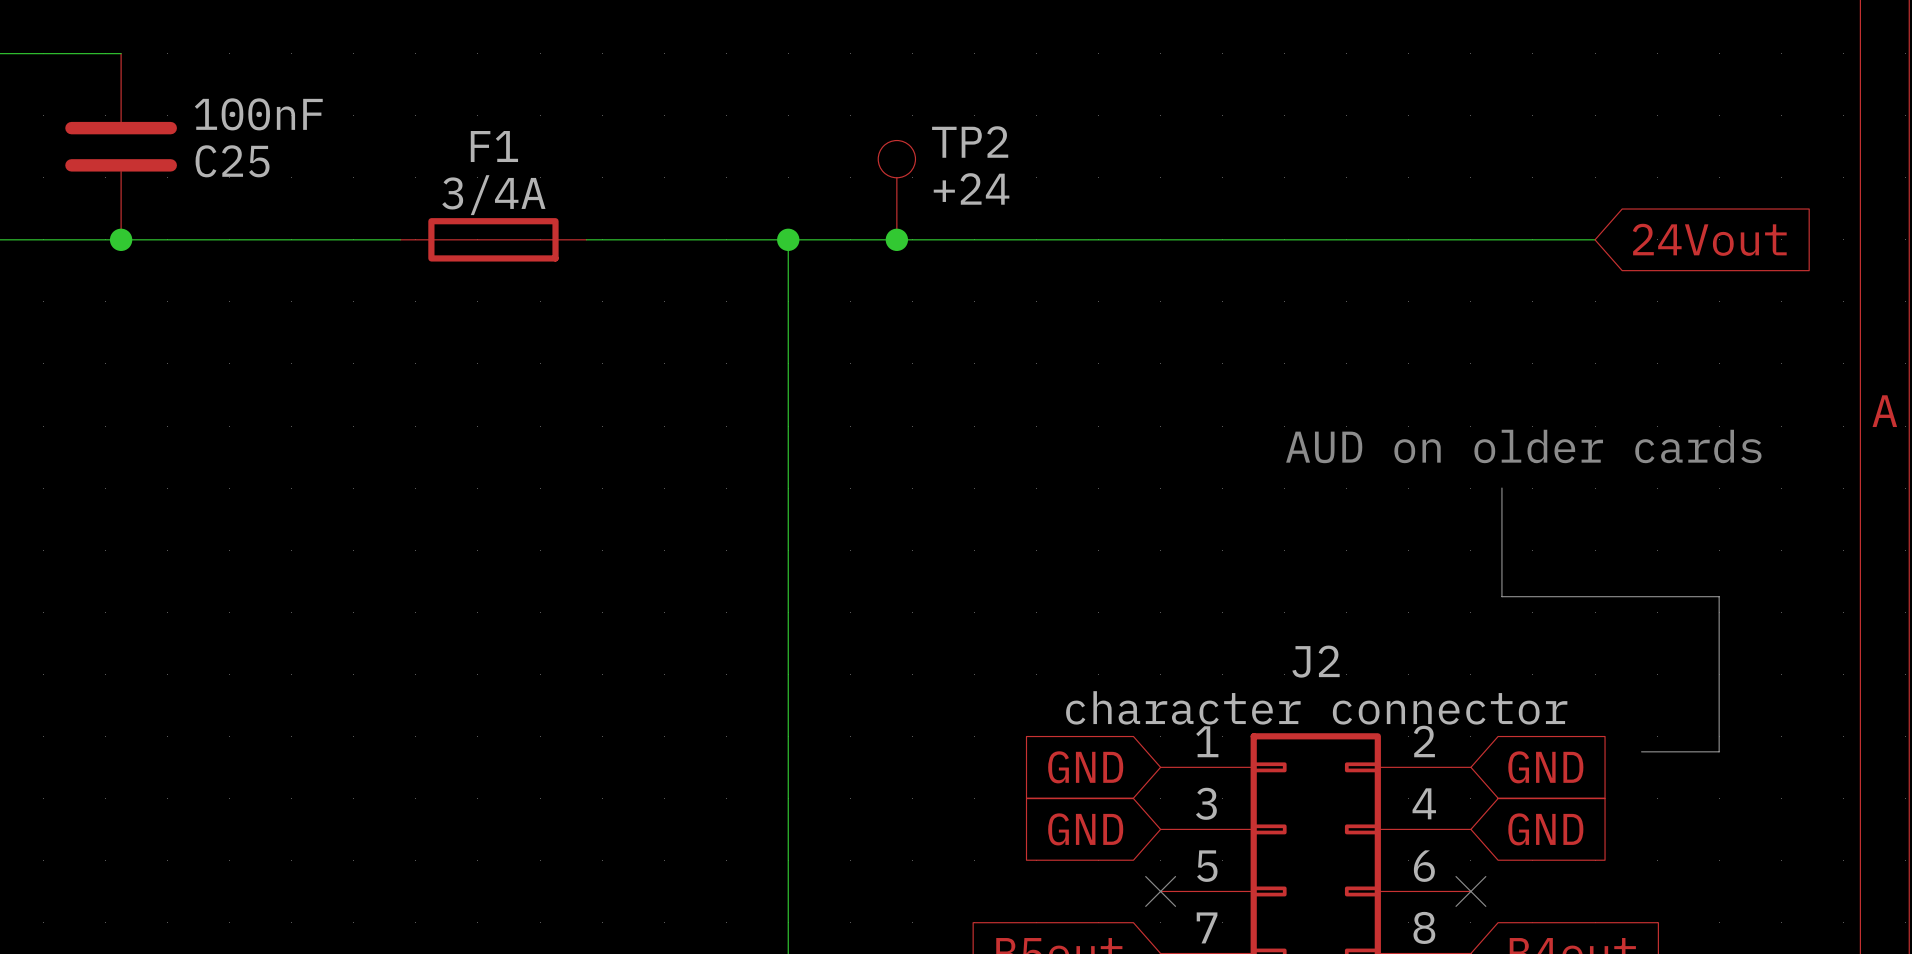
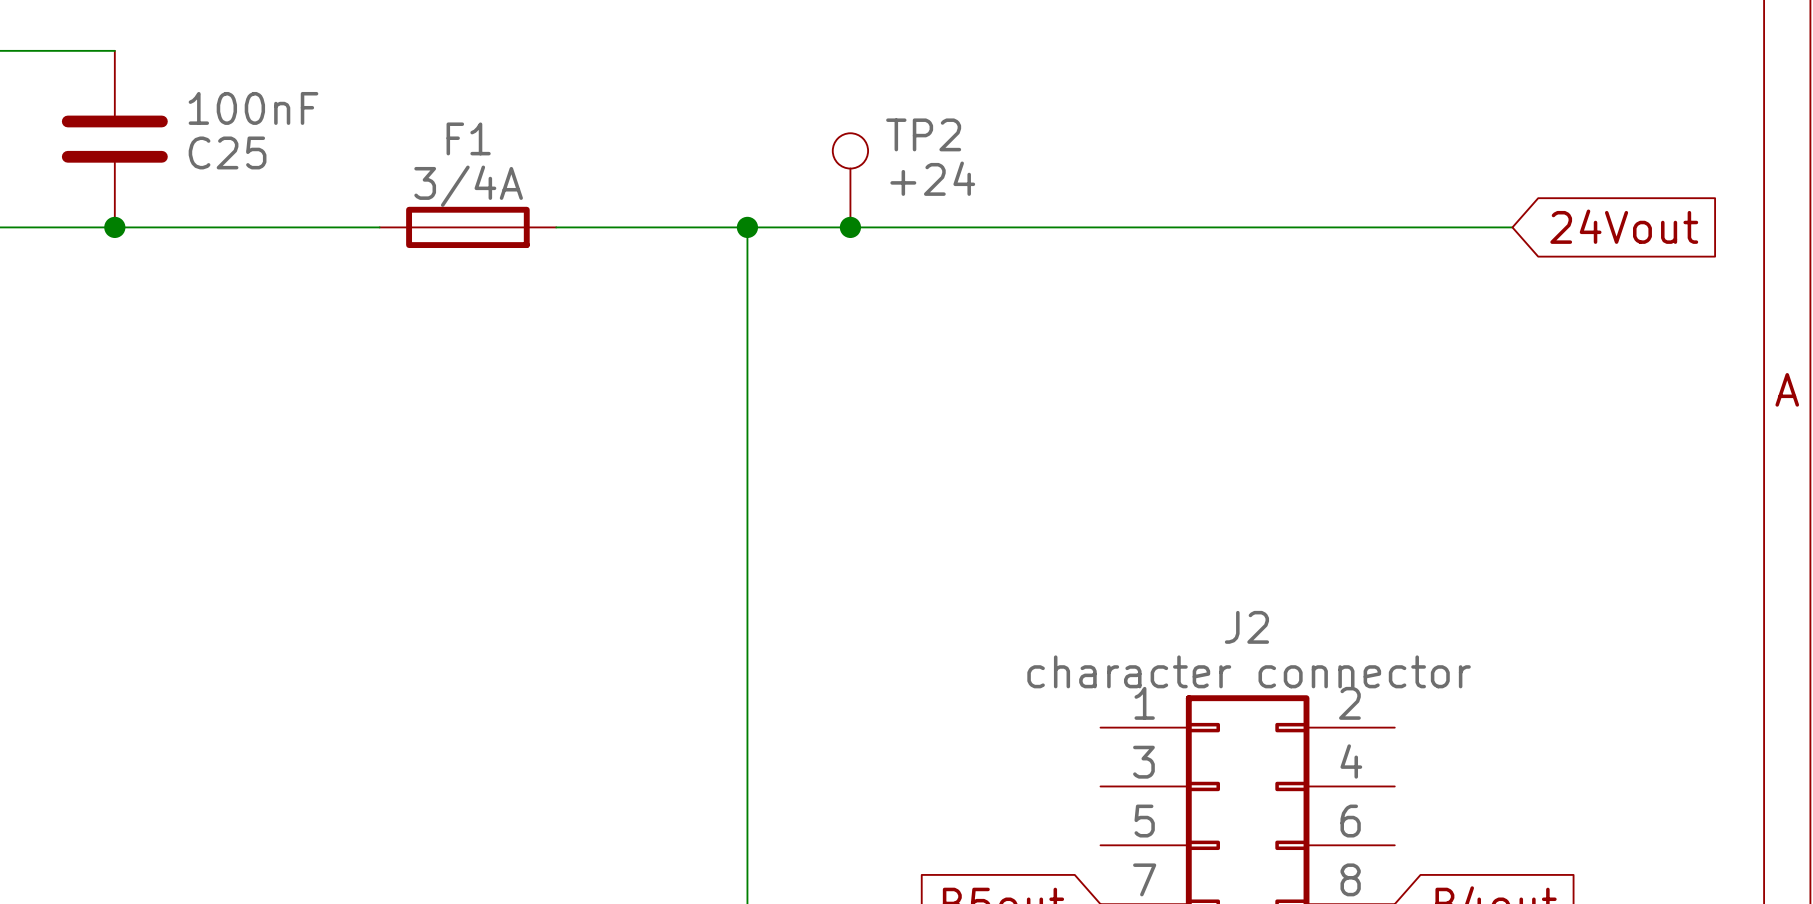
text: AUD on older cards (1523, 446) -> none
line: (1501, 488) (1501, 596) (1719, 596) (1719, 751) (1641, 751) -> none
global label: GND (1085, 767) -> none
global label: GND (1545, 767) -> none
global label: GND (1085, 829) -> none
global label: GND (1545, 829) -> none
no-connect mark: (1160, 891) -> none
no-connect mark: (1470, 891) -> none

